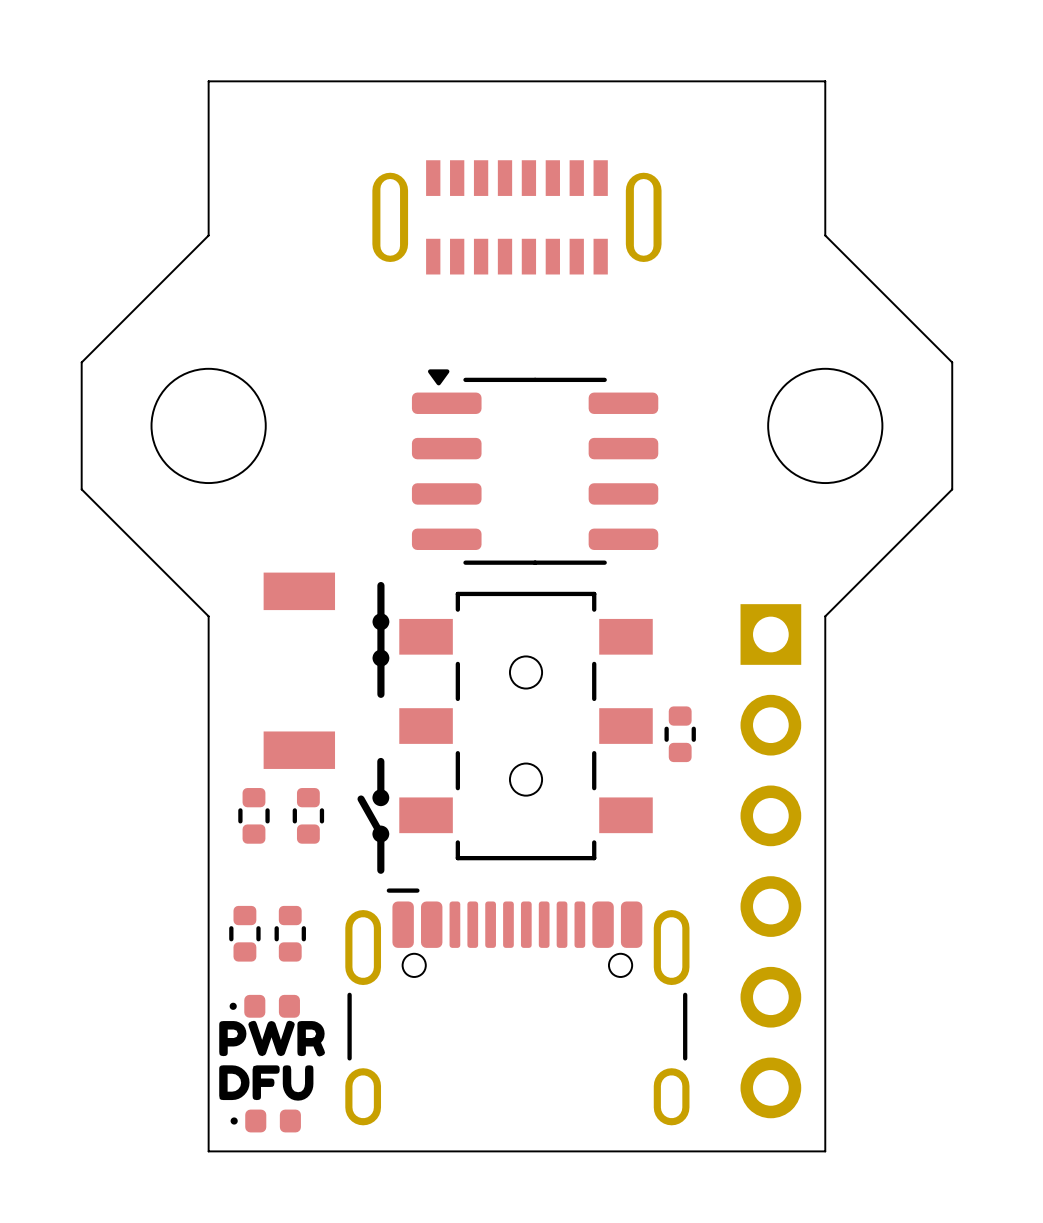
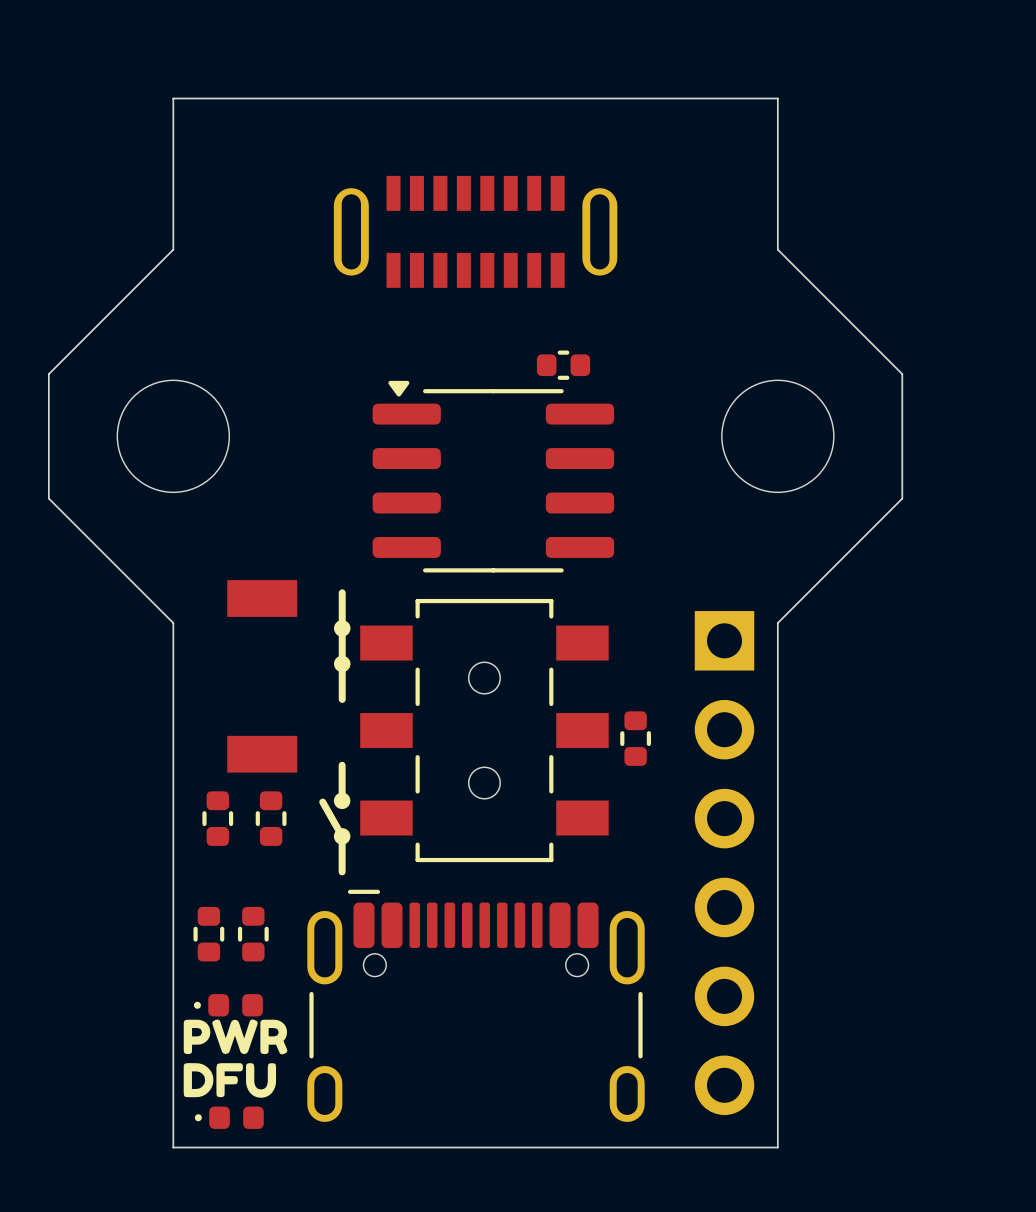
part: none -> (563, 365)

